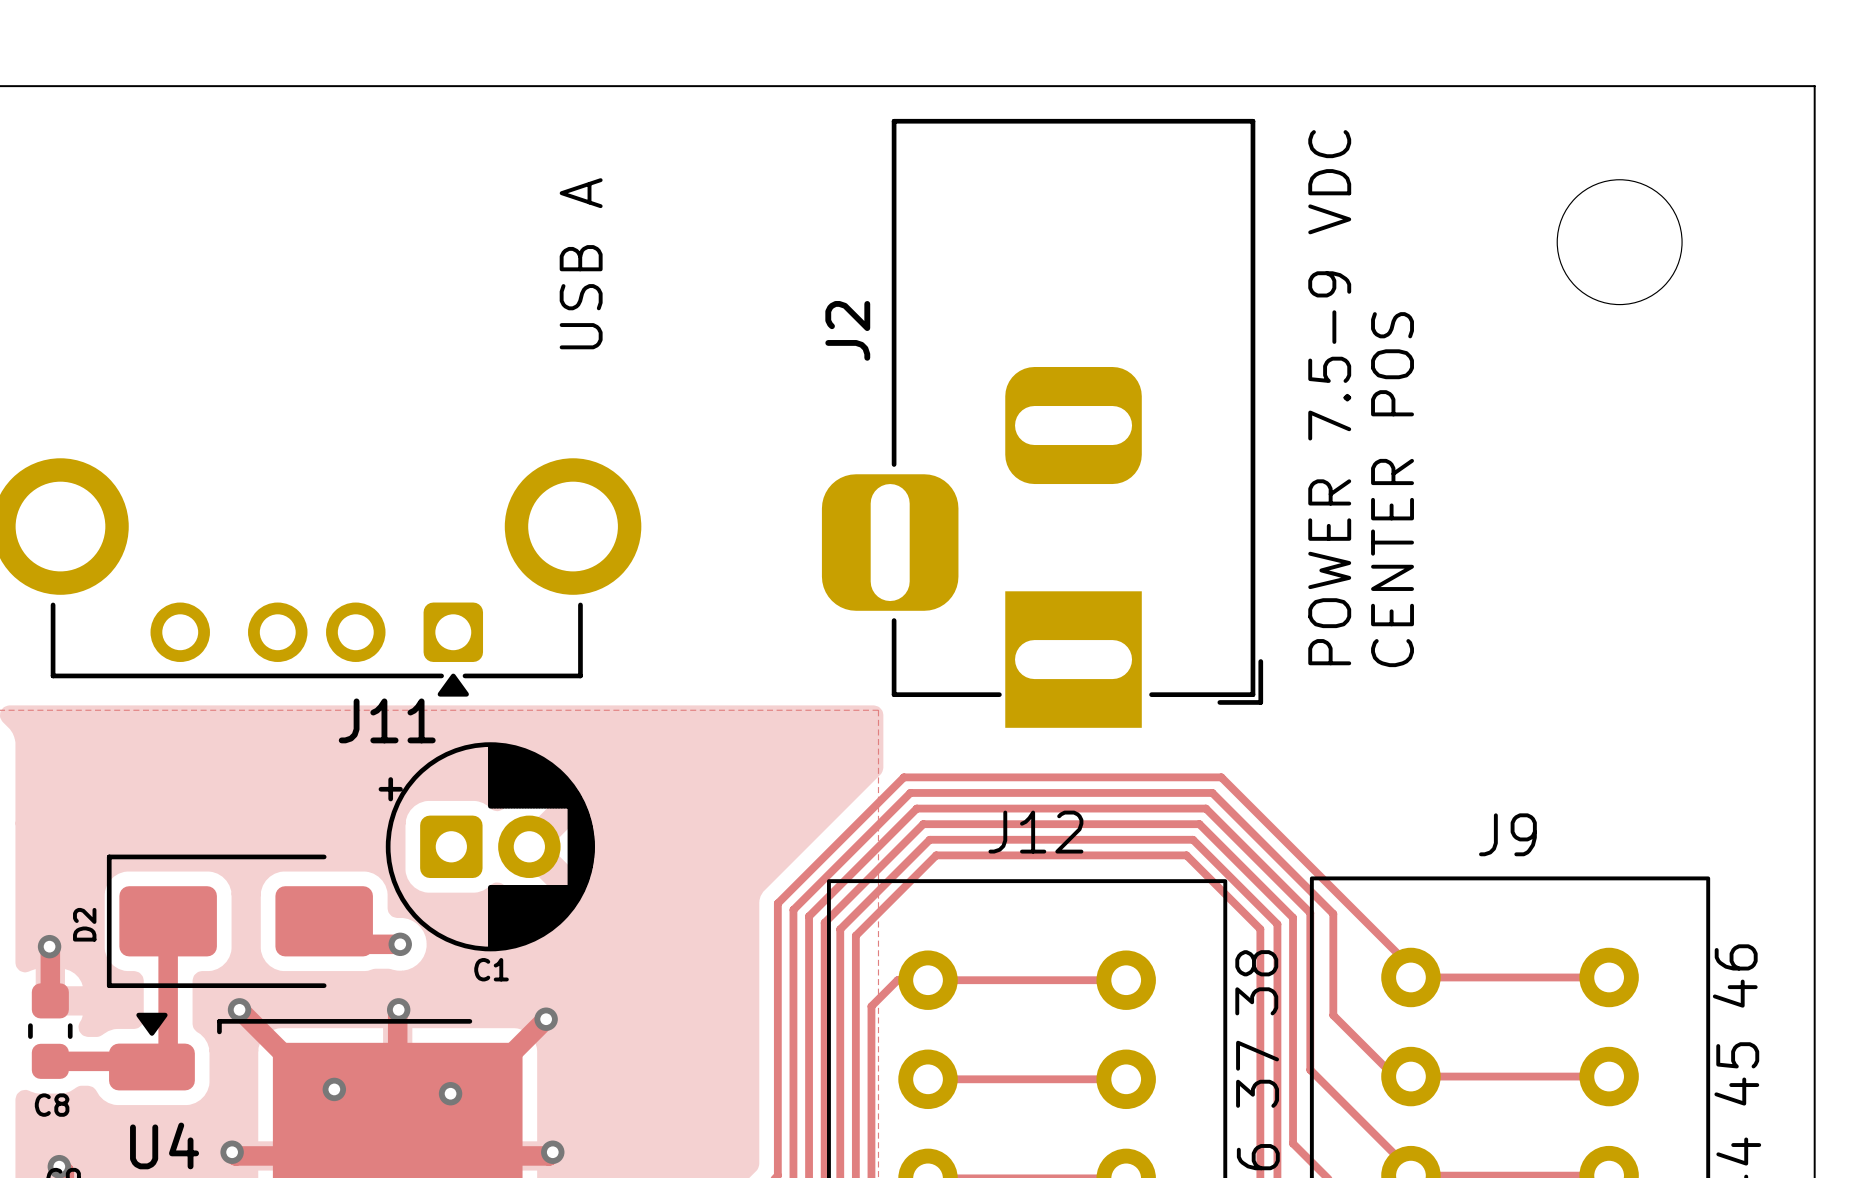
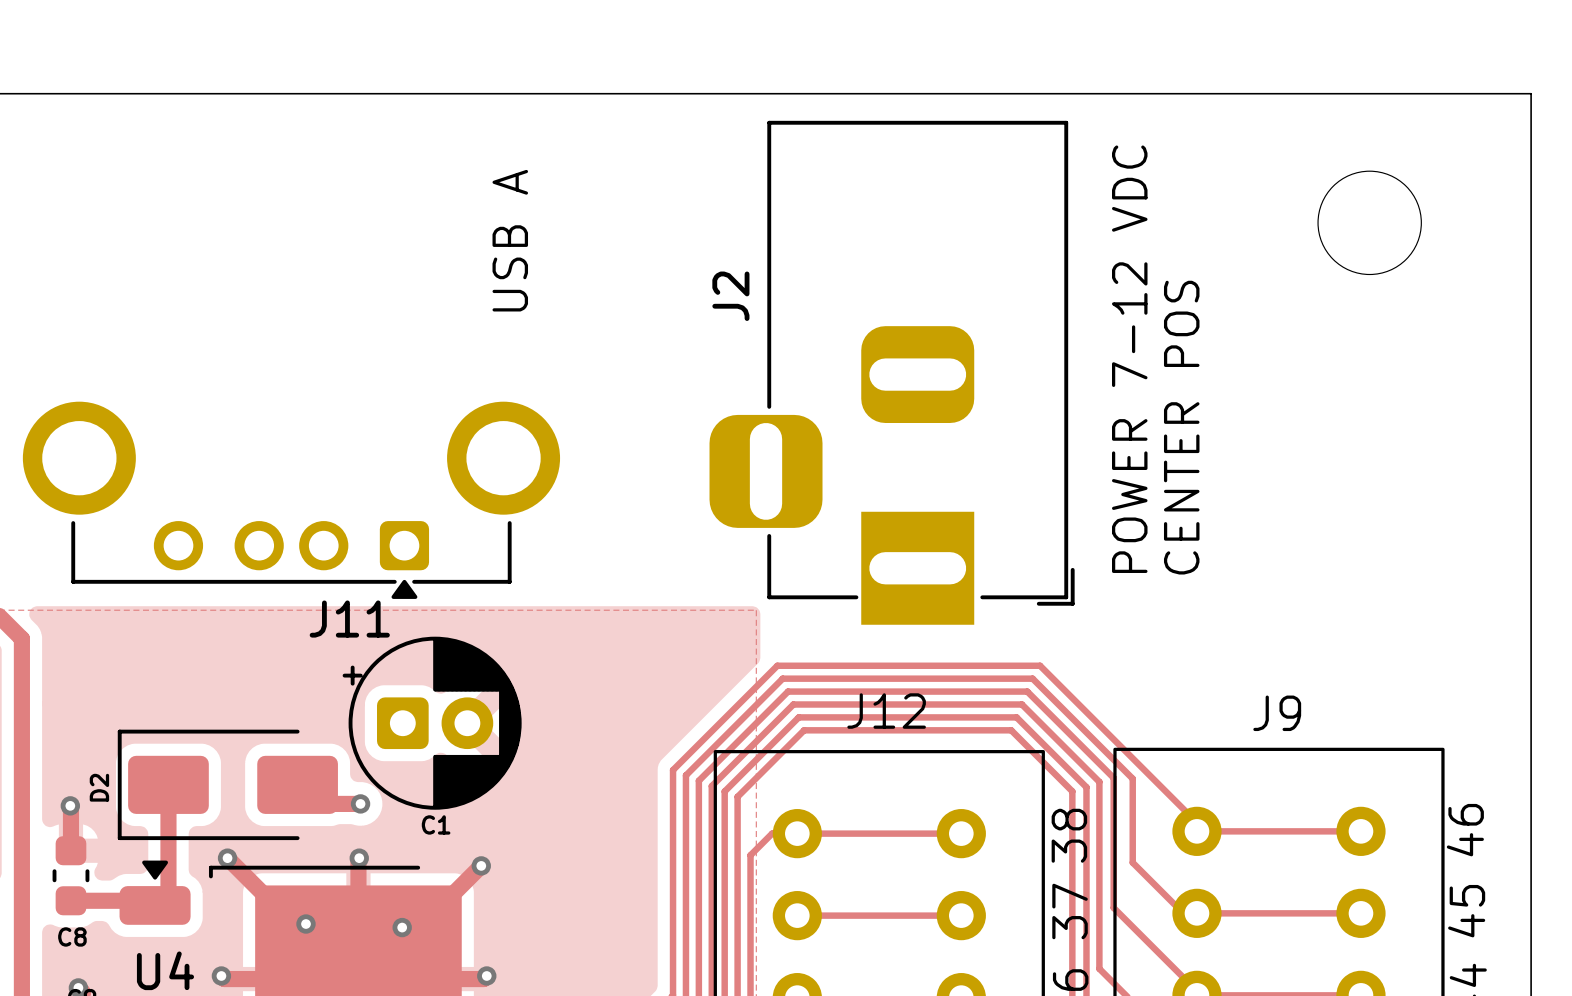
text: POWER 7.5-9 VDC (1329, 397) -> POWER 7-12 VDC (1129, 359)

